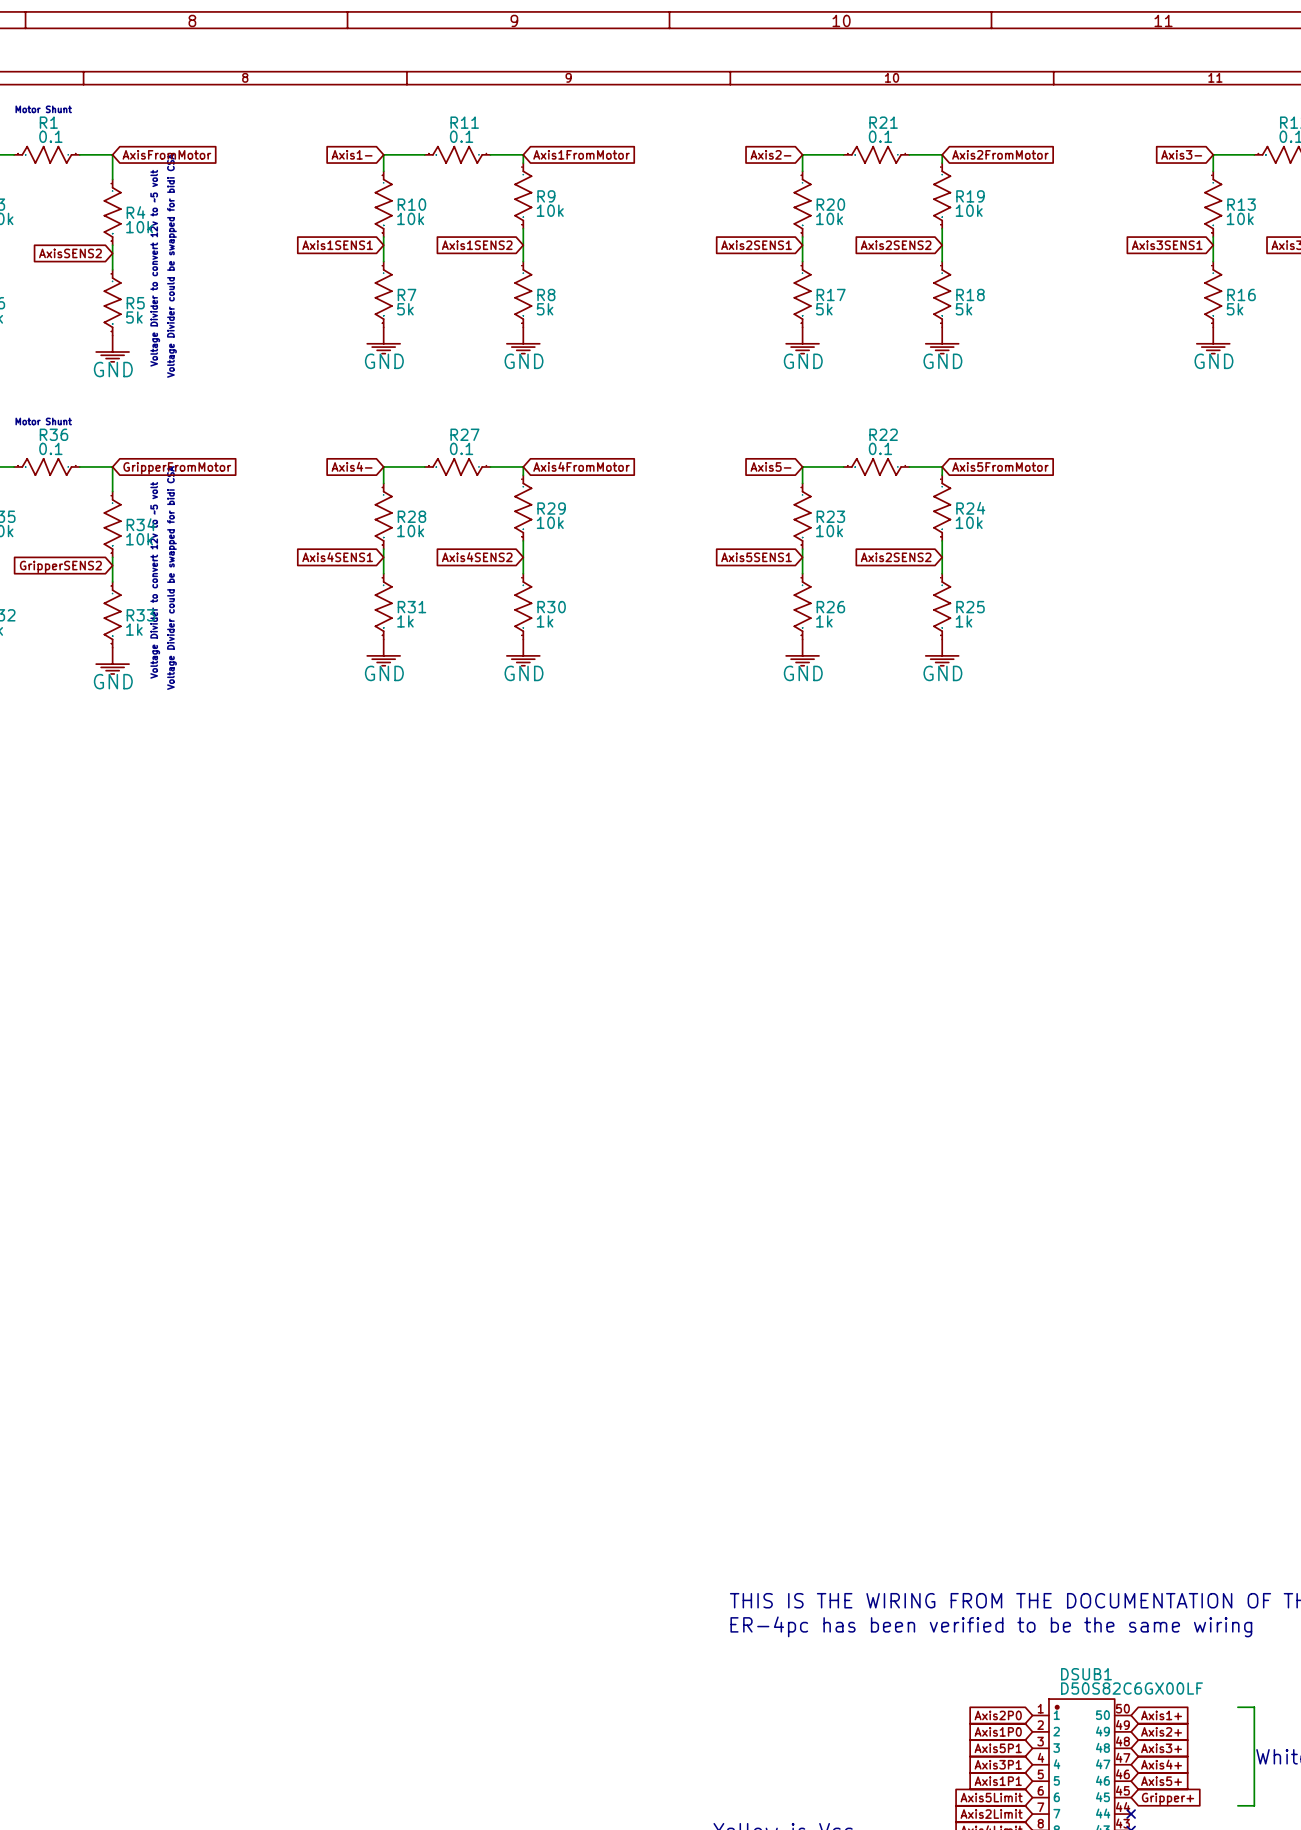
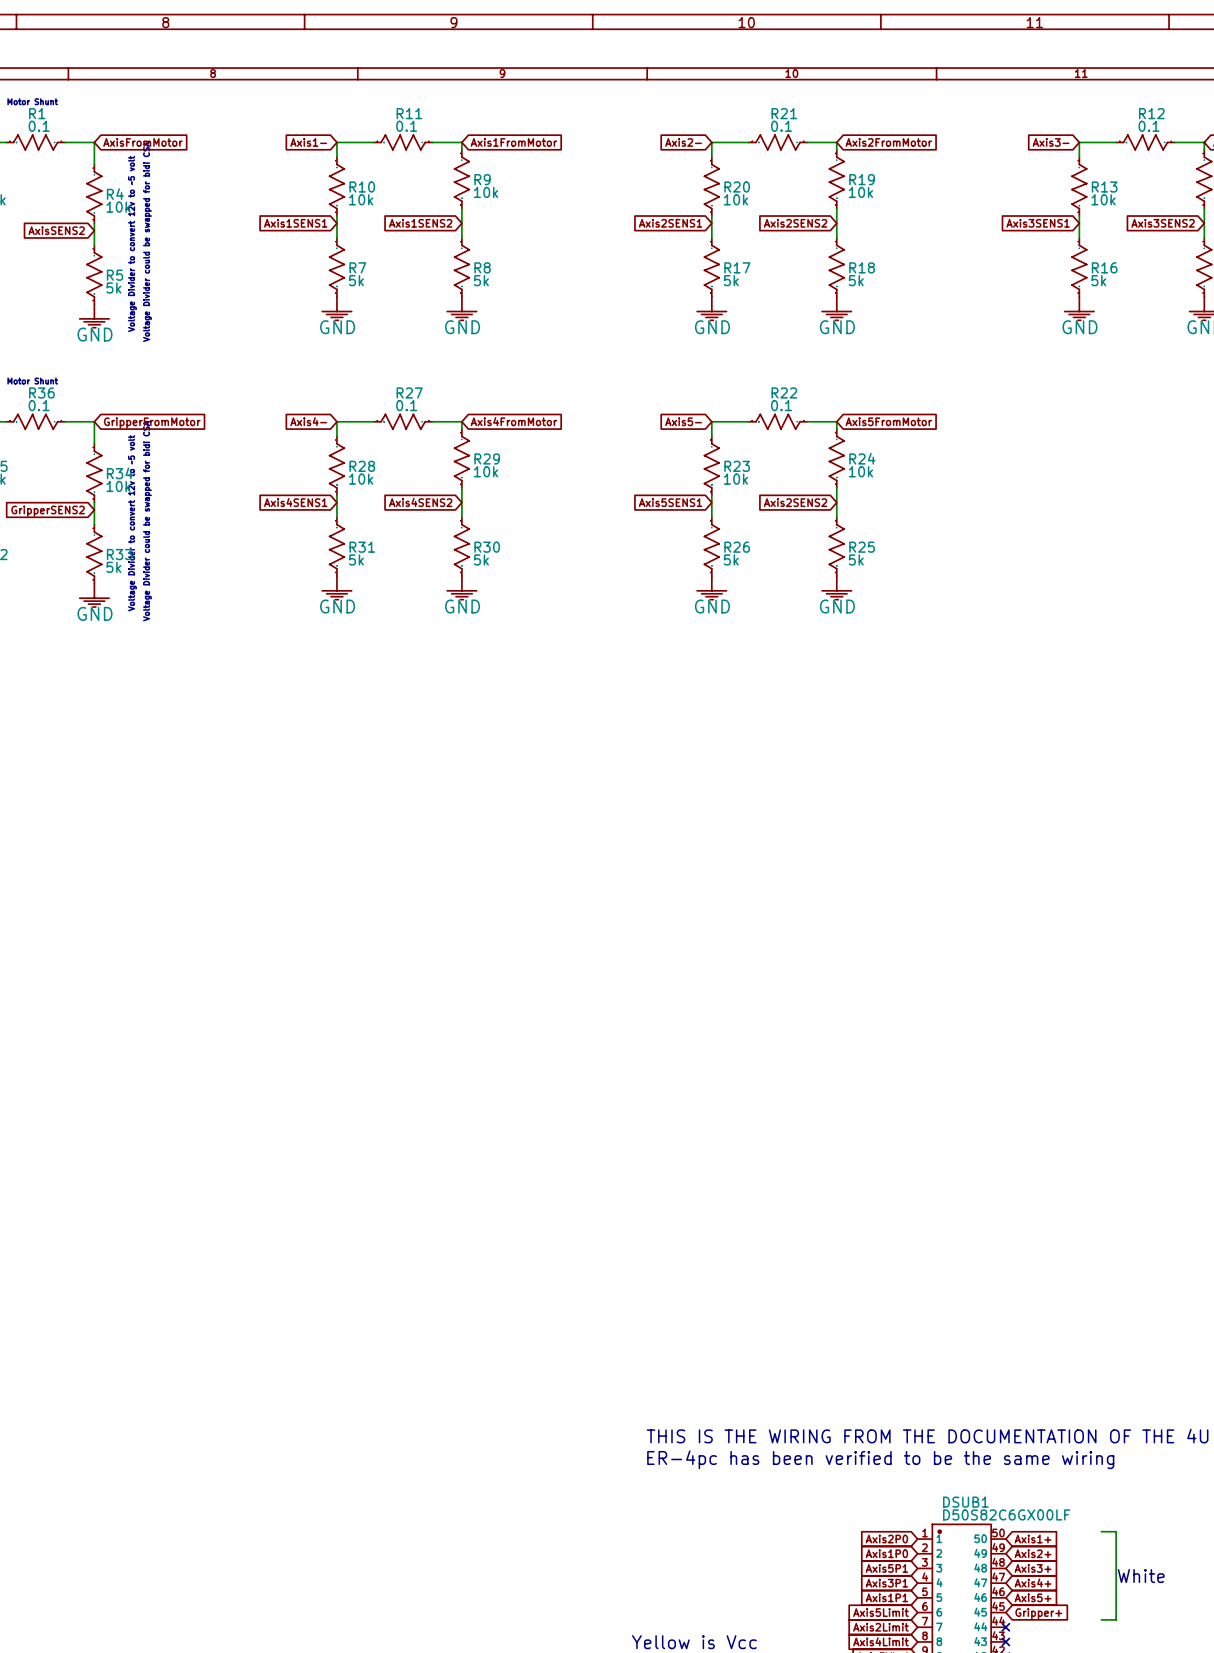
R31 value: 1k (405, 621) -> 5k (356, 559)
R30 value: 1k (545, 621) -> 5k (481, 559)
R26 value: 1k (824, 621) -> 5k (731, 559)
R25 value: 1k (963, 621) -> 5k (856, 559)
R33 value: 1k (134, 629) -> 5k (113, 567)

